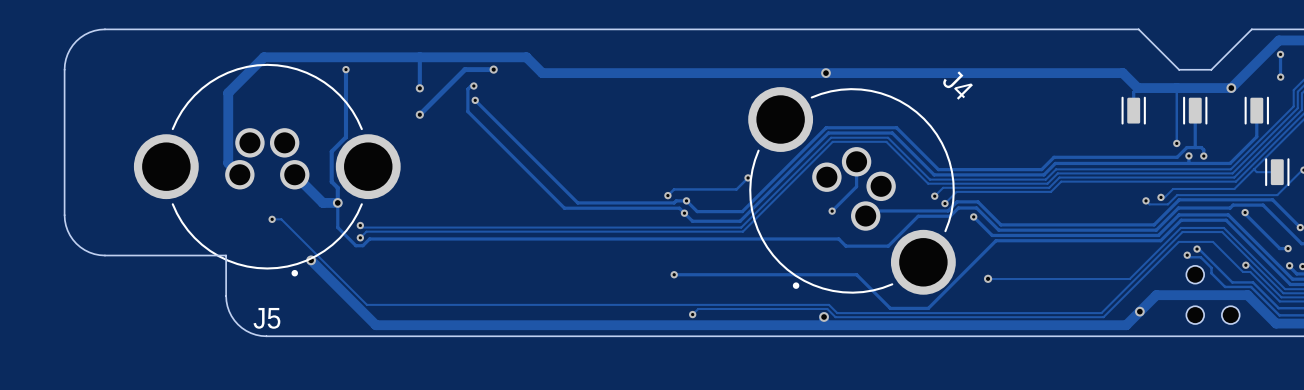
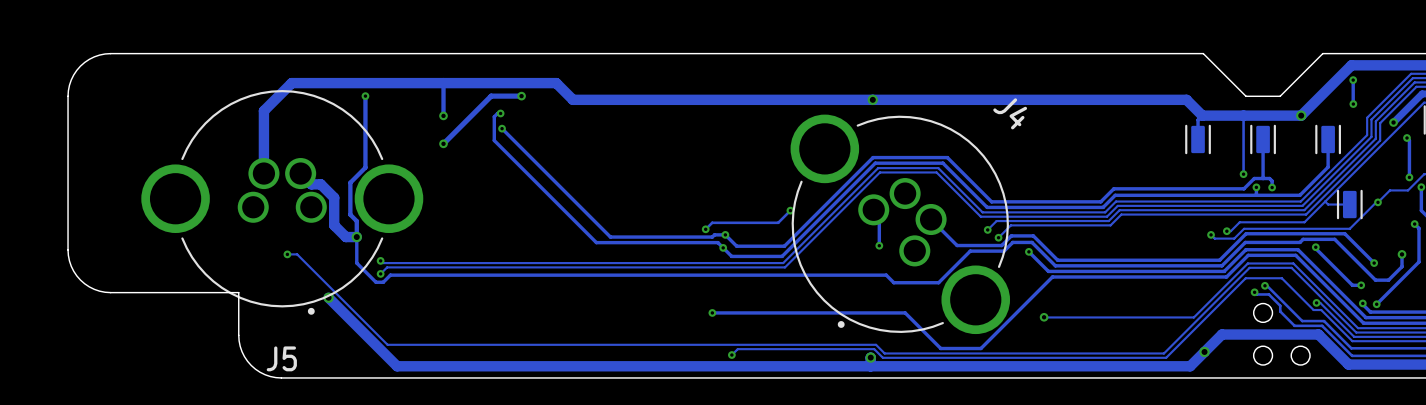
track: (276, 57) (263, 57) (228, 92) (228, 163) (239, 174) -> (291, 83) (263, 110) (263, 173)
track: (856, 161) (856, 186) (832, 211) -> (873, 209) (879, 215) (879, 245)
track: (294, 174) (322, 202) (327, 202) -> (300, 173) (311, 184) (320, 184) (334, 197) (334, 225) (345, 237)
track: (905, 210) (870, 210) (865, 216) -> (957, 245) (931, 219)

